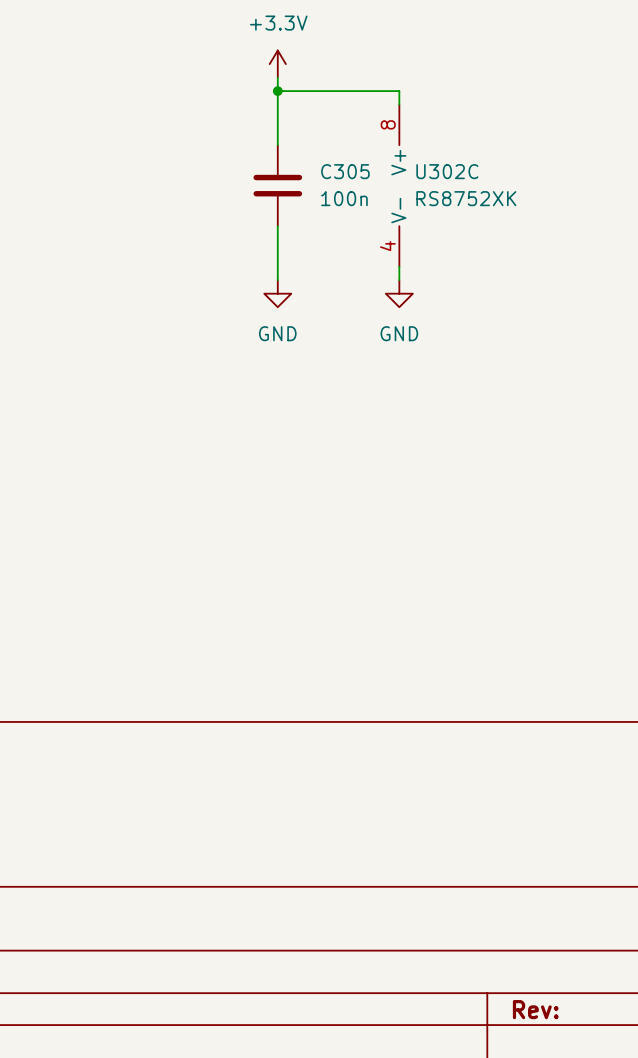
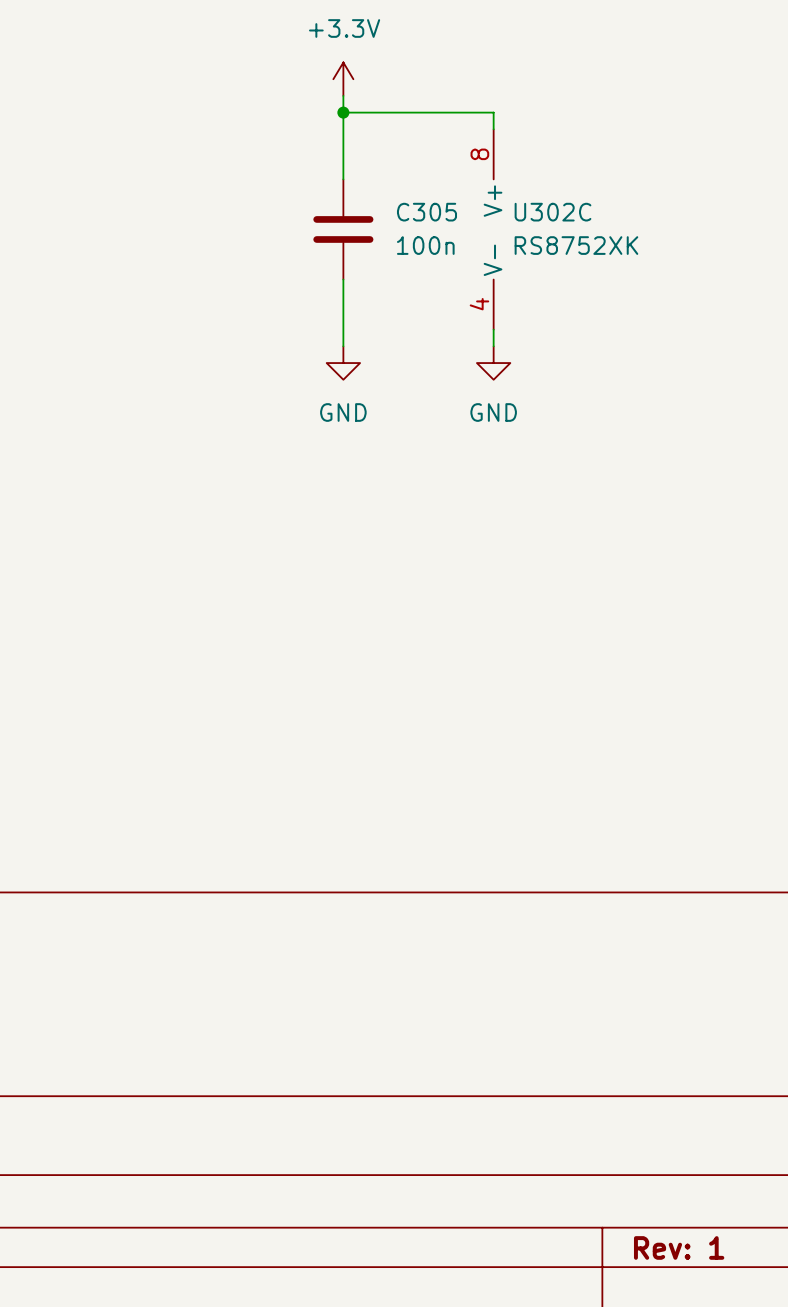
title block: Rev: (535, 1009) -> Rev: 1 (679, 1247)

